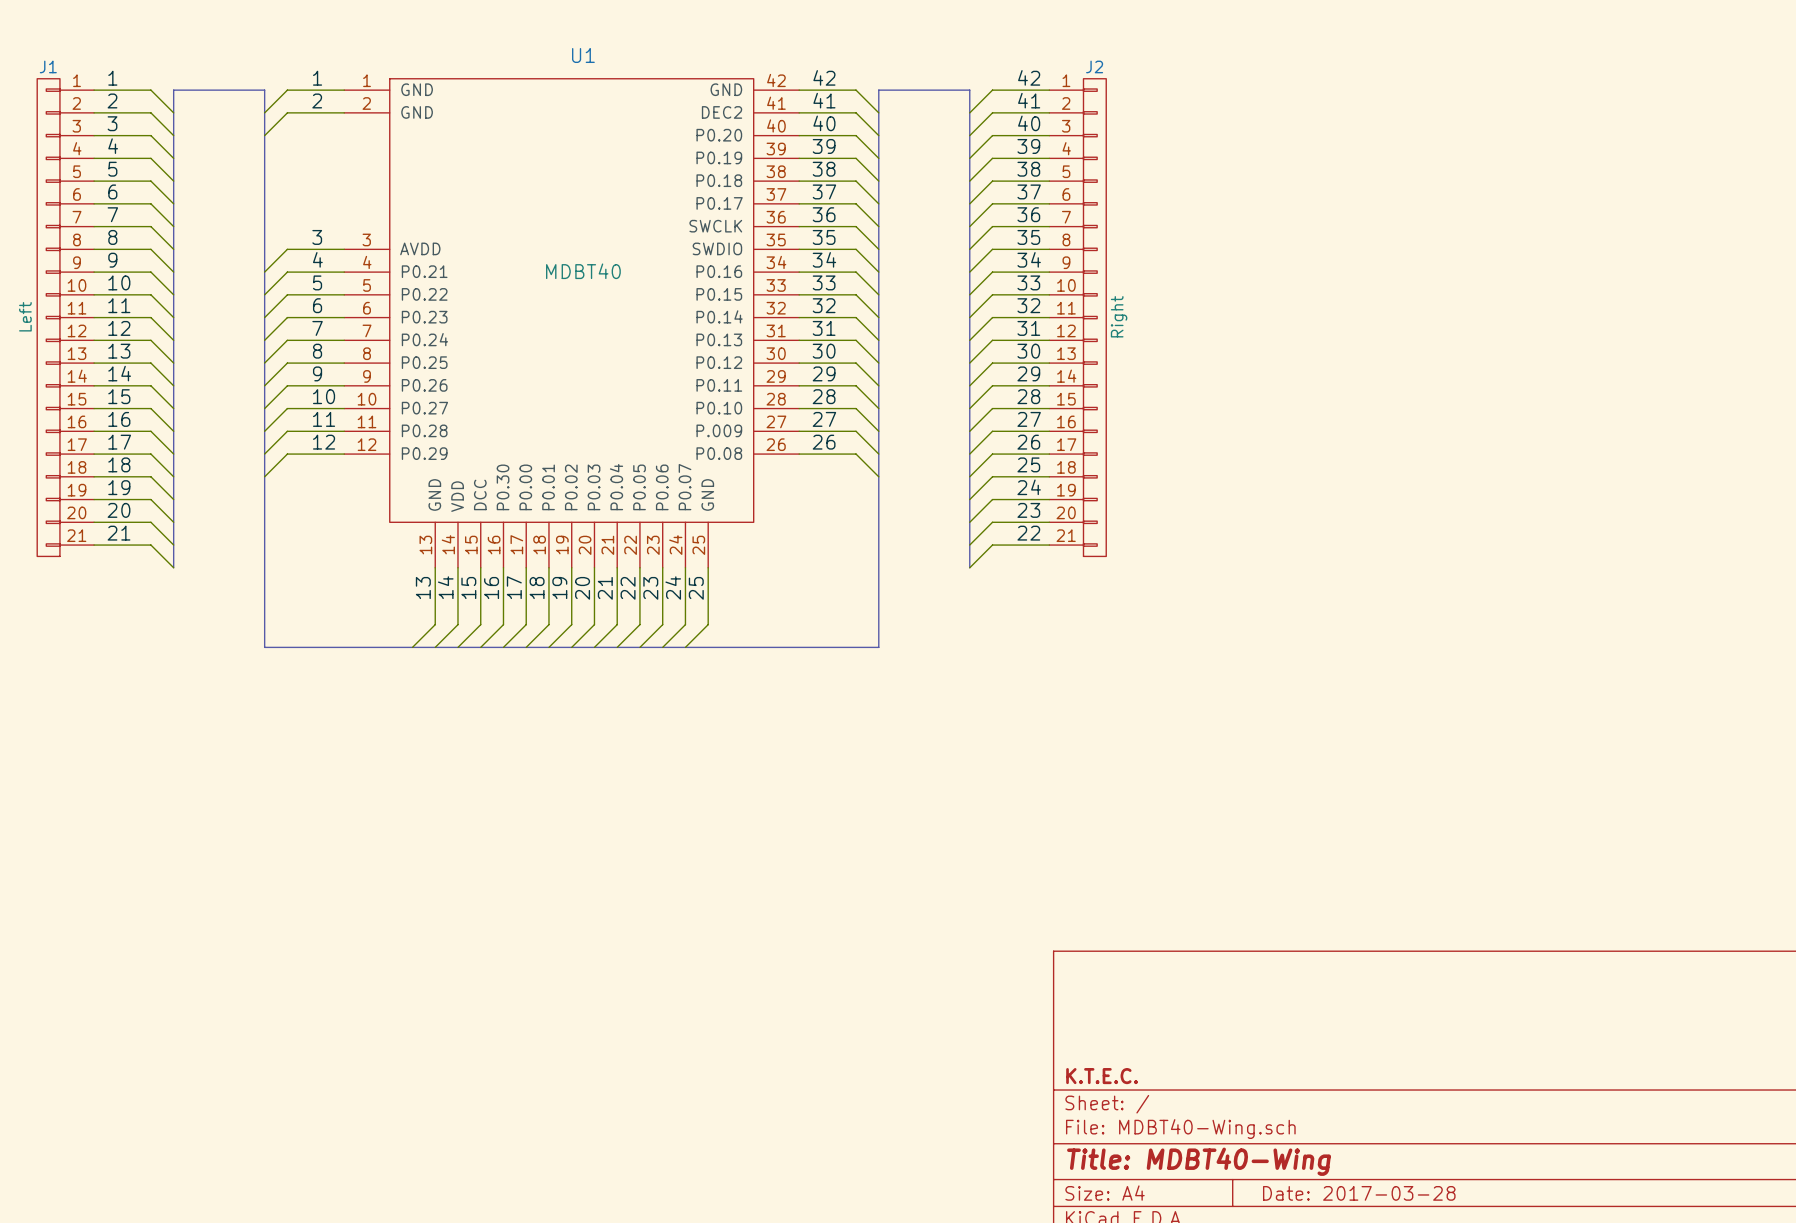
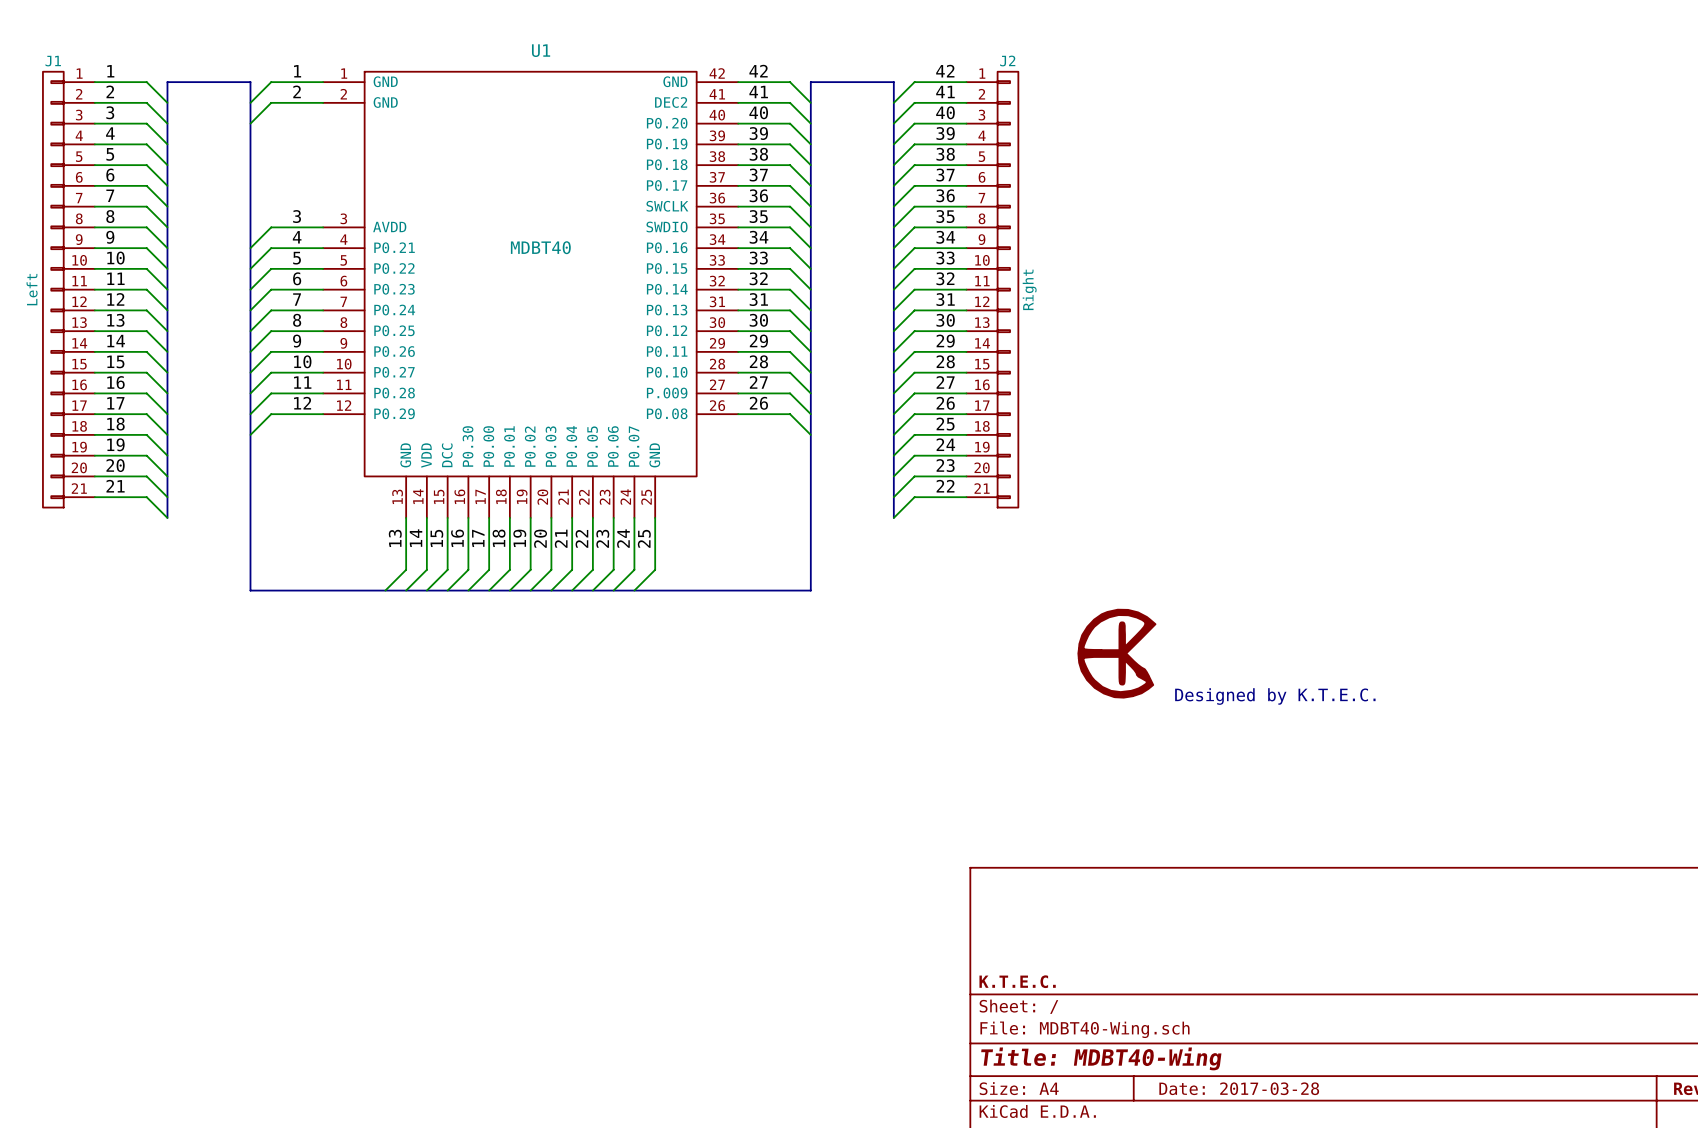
power symbol: none -> (1116, 653)
text: none -> Designed by K.T.E.C. (1275, 696)

